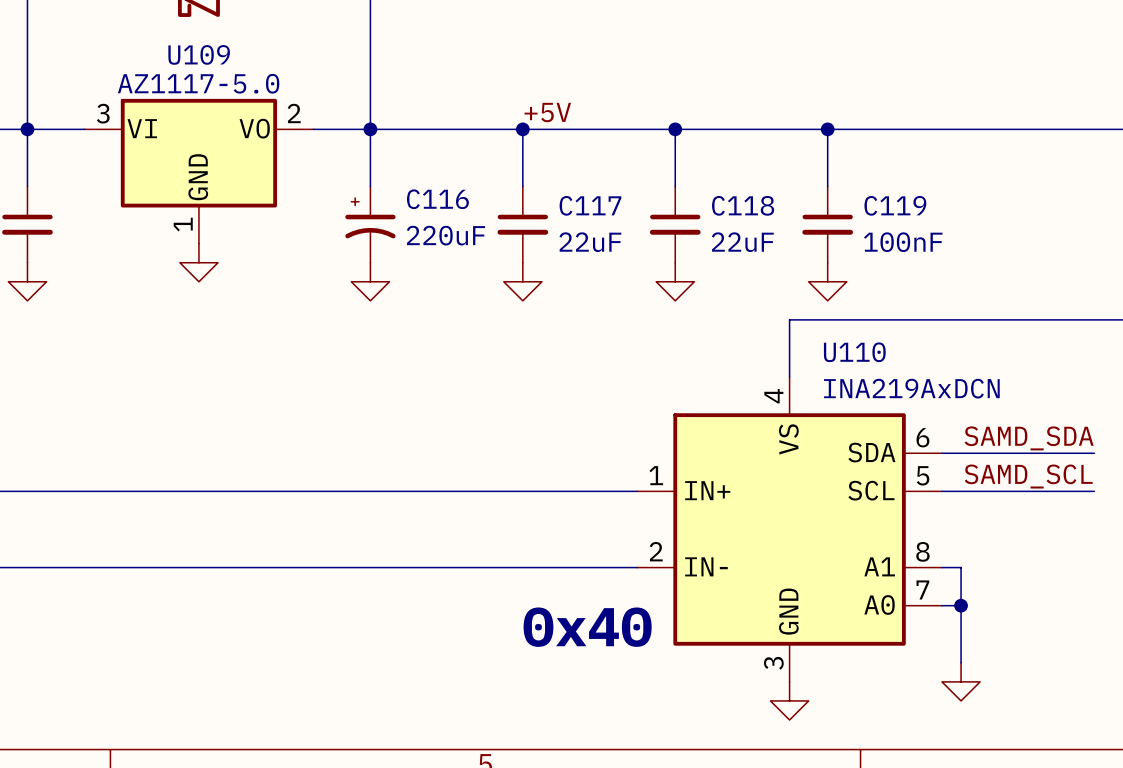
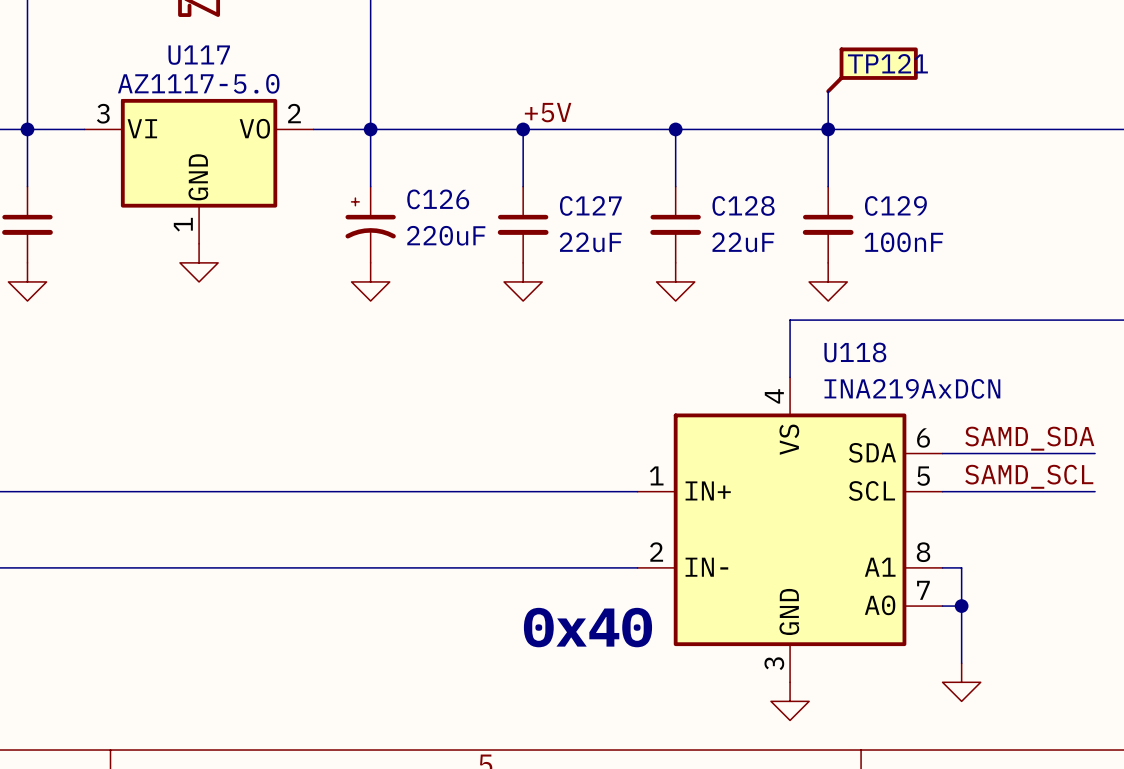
U109 name: U109 (199, 54) -> U117 (199, 55)
TP121: none -> (872, 70)
wire: none -> (828, 91) (828, 129)
C116 name: C116 (437, 199) -> C126 (438, 199)
C117 name: C117 (590, 205) -> C127 (590, 205)
C118 name: C118 (743, 205) -> C128 (743, 205)
C119 name: C119 (895, 205) -> C129 (895, 205)
U110 name: U110 (854, 352) -> U118 (855, 352)

